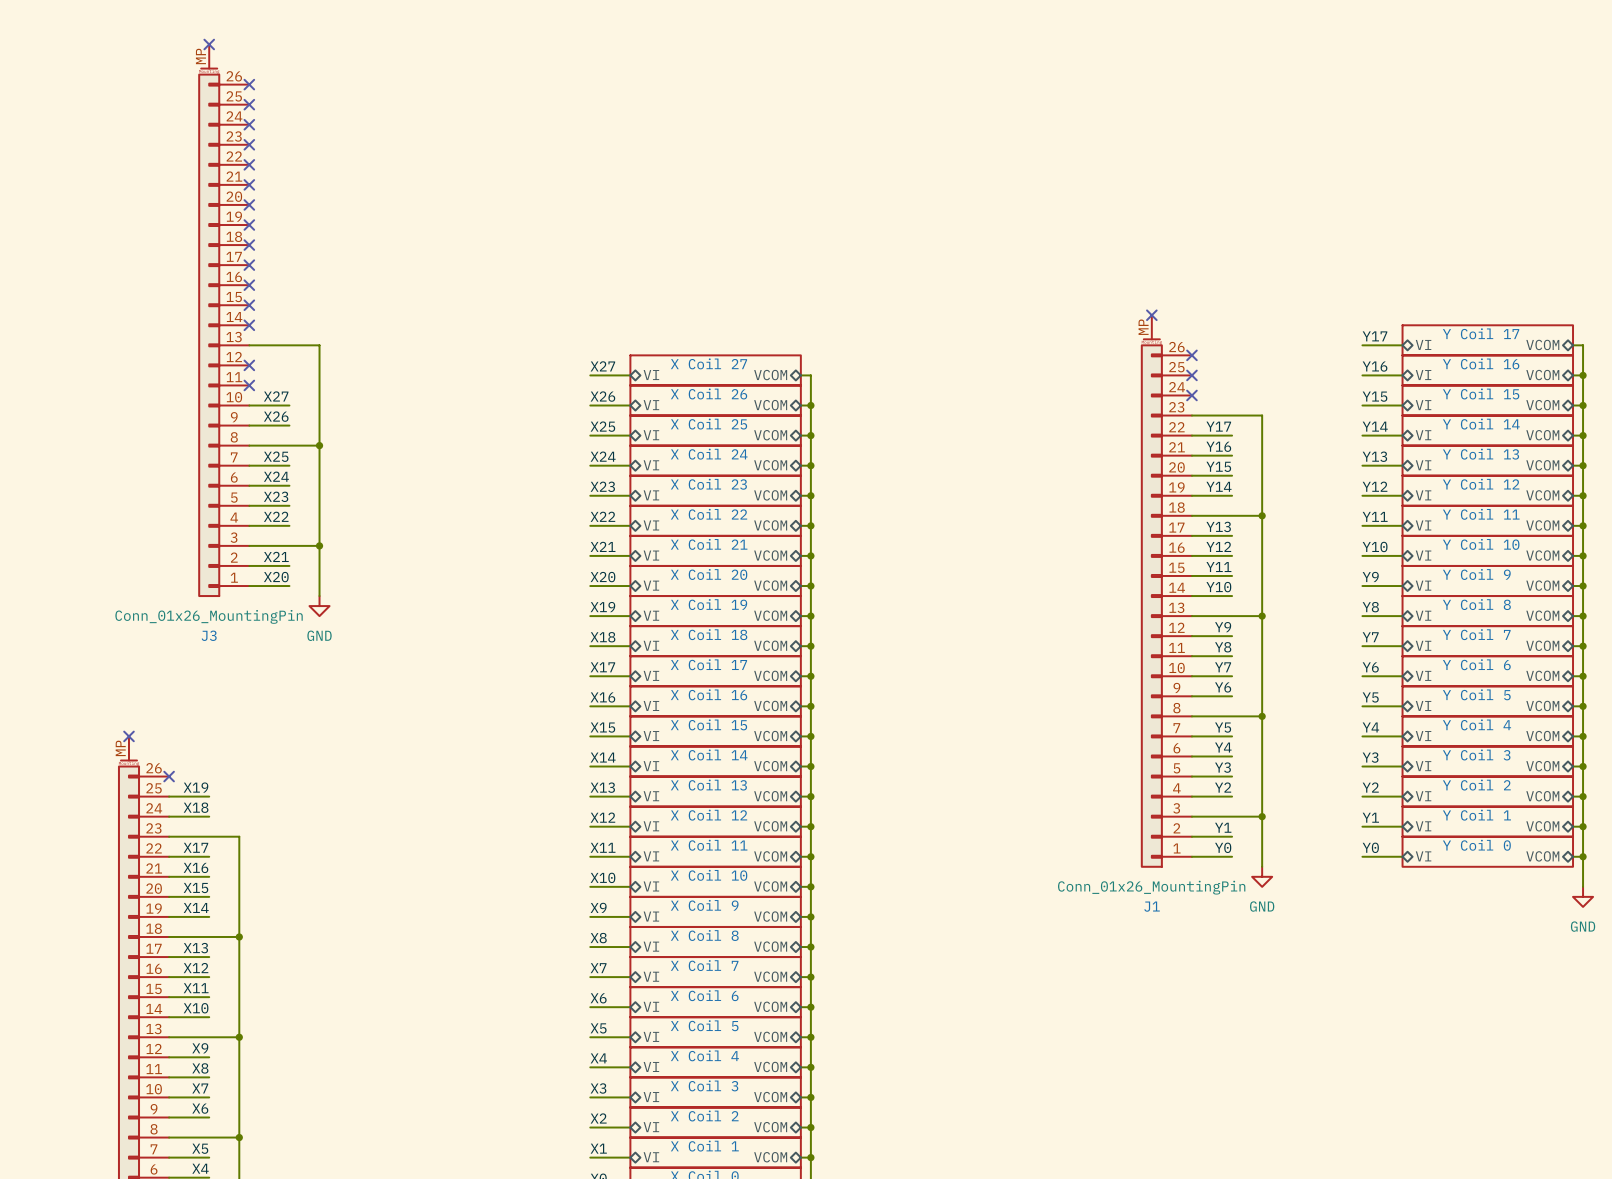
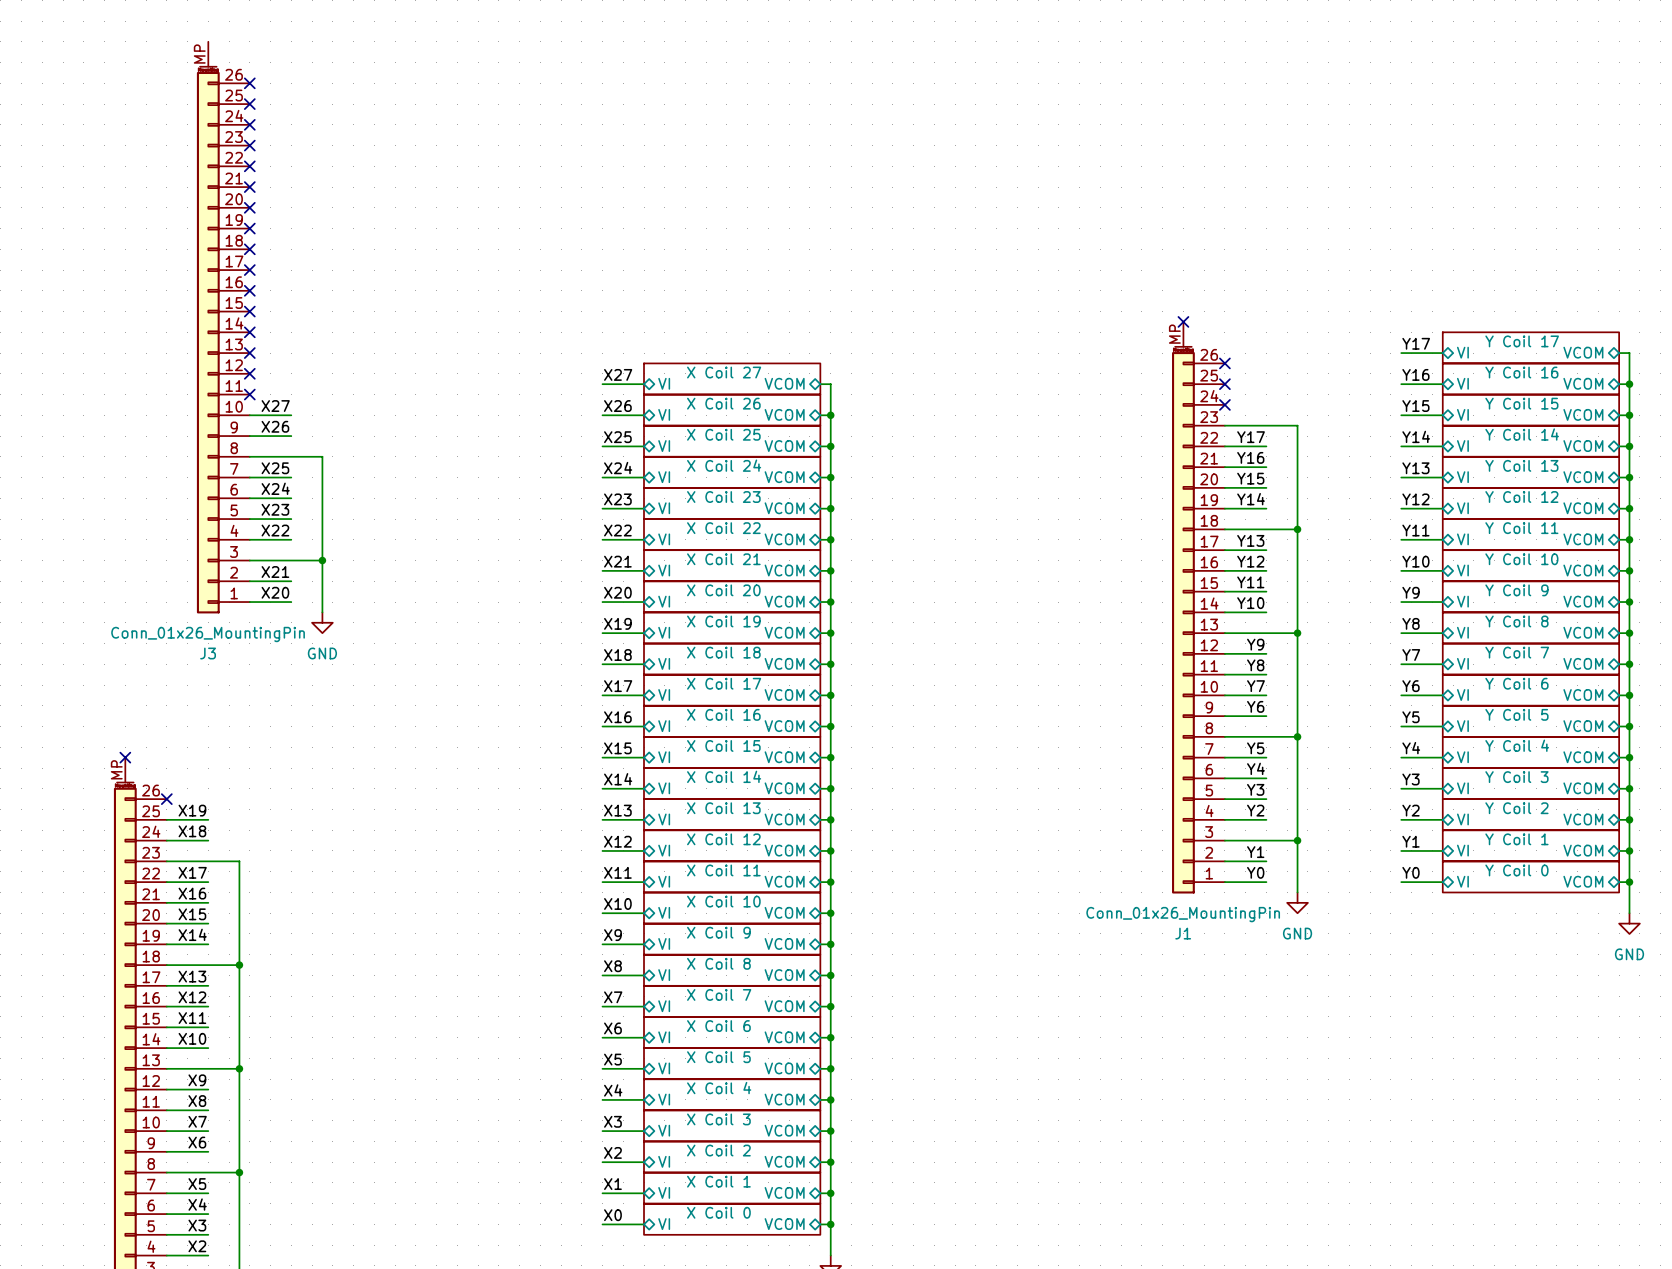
no-connect mark: (209, 44) -> none
wire: (249, 345) (319, 345) (319, 445) -> none
no-connect mark: none -> (249, 353)
junction: (319, 445) -> none

